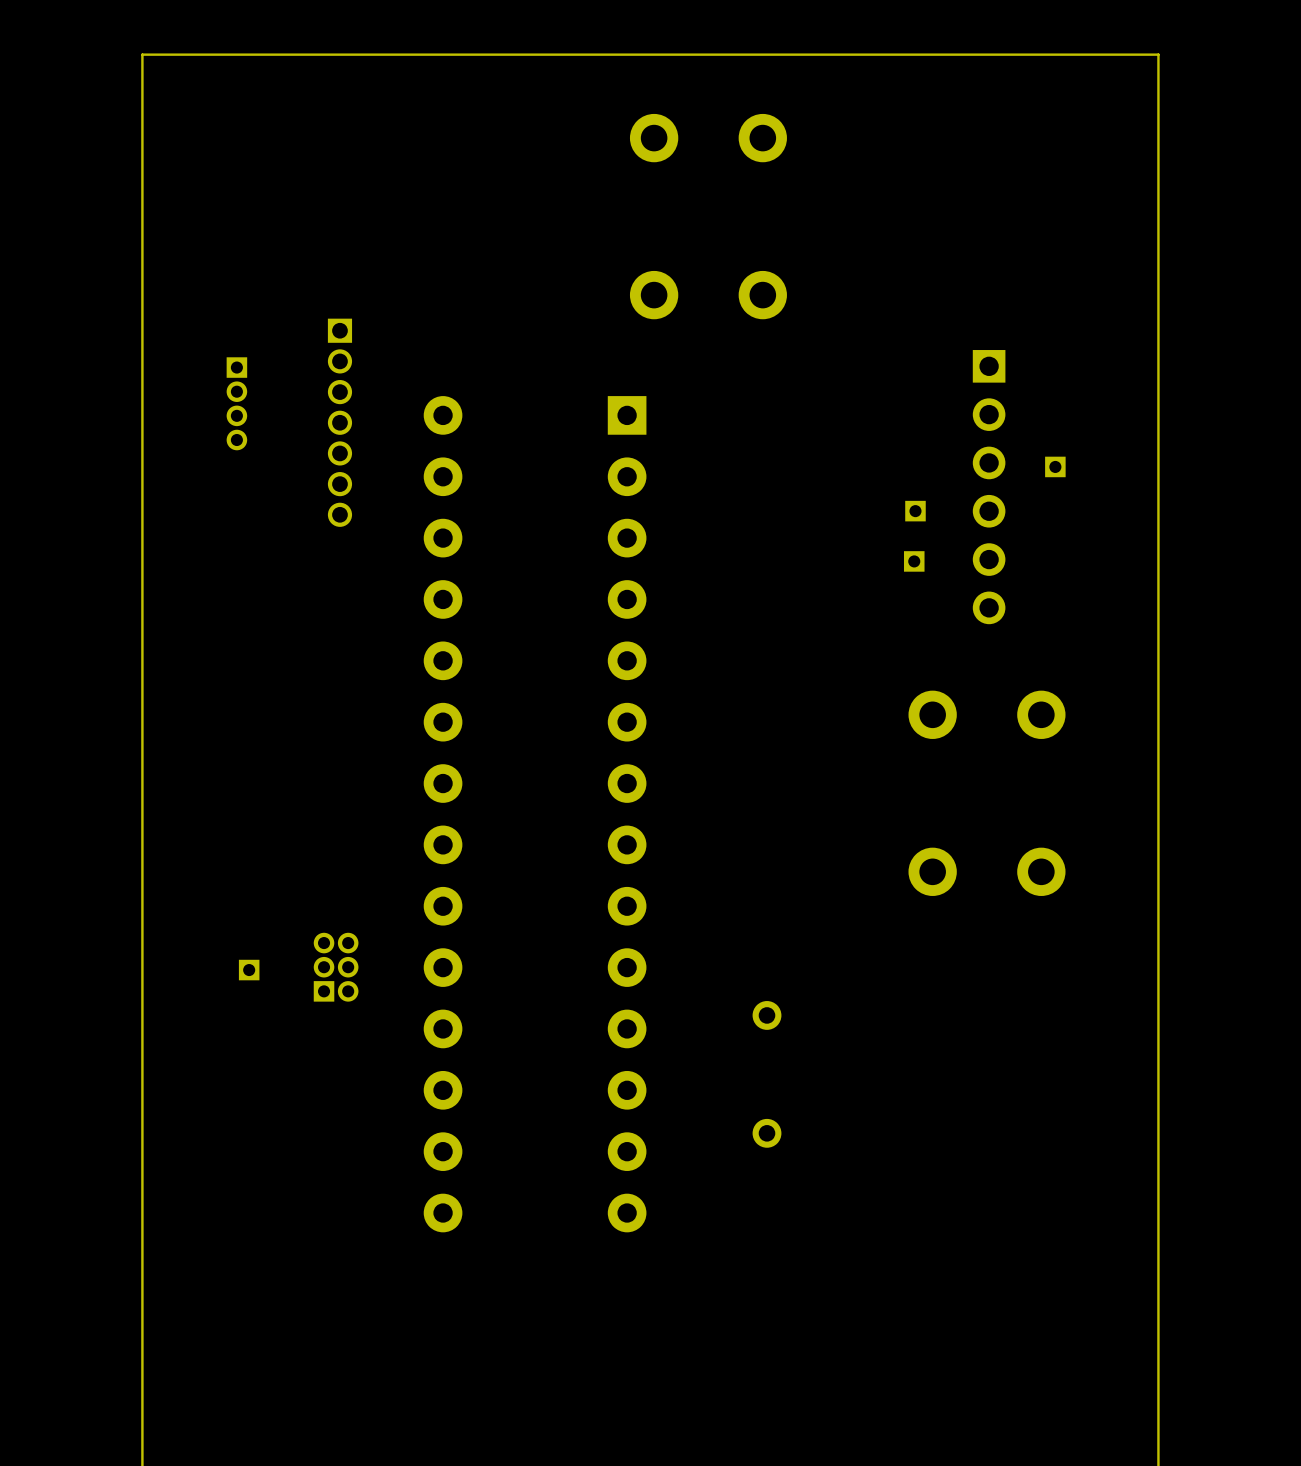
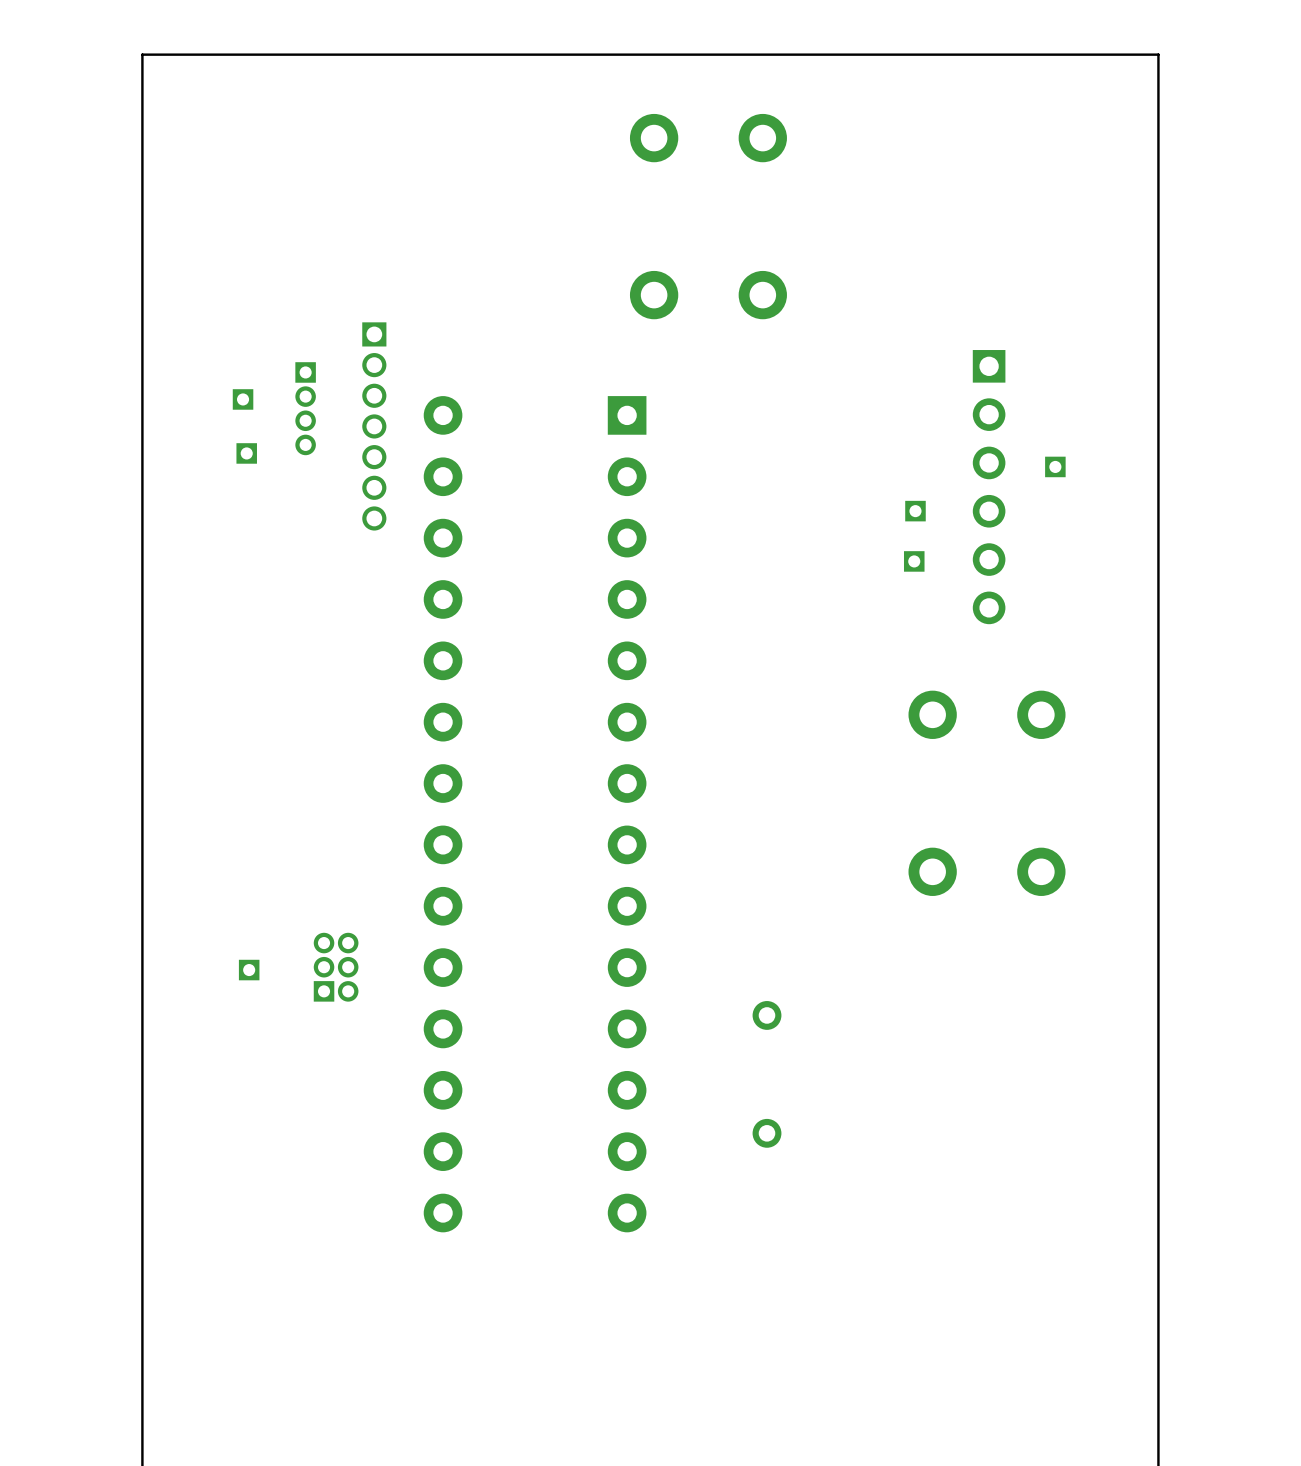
part footprint: [226, 357, 248, 451] -> [232, 389, 254, 410]
part: none -> (305, 408)
part position: (339, 422) -> (374, 426)
part: none -> (246, 453)

